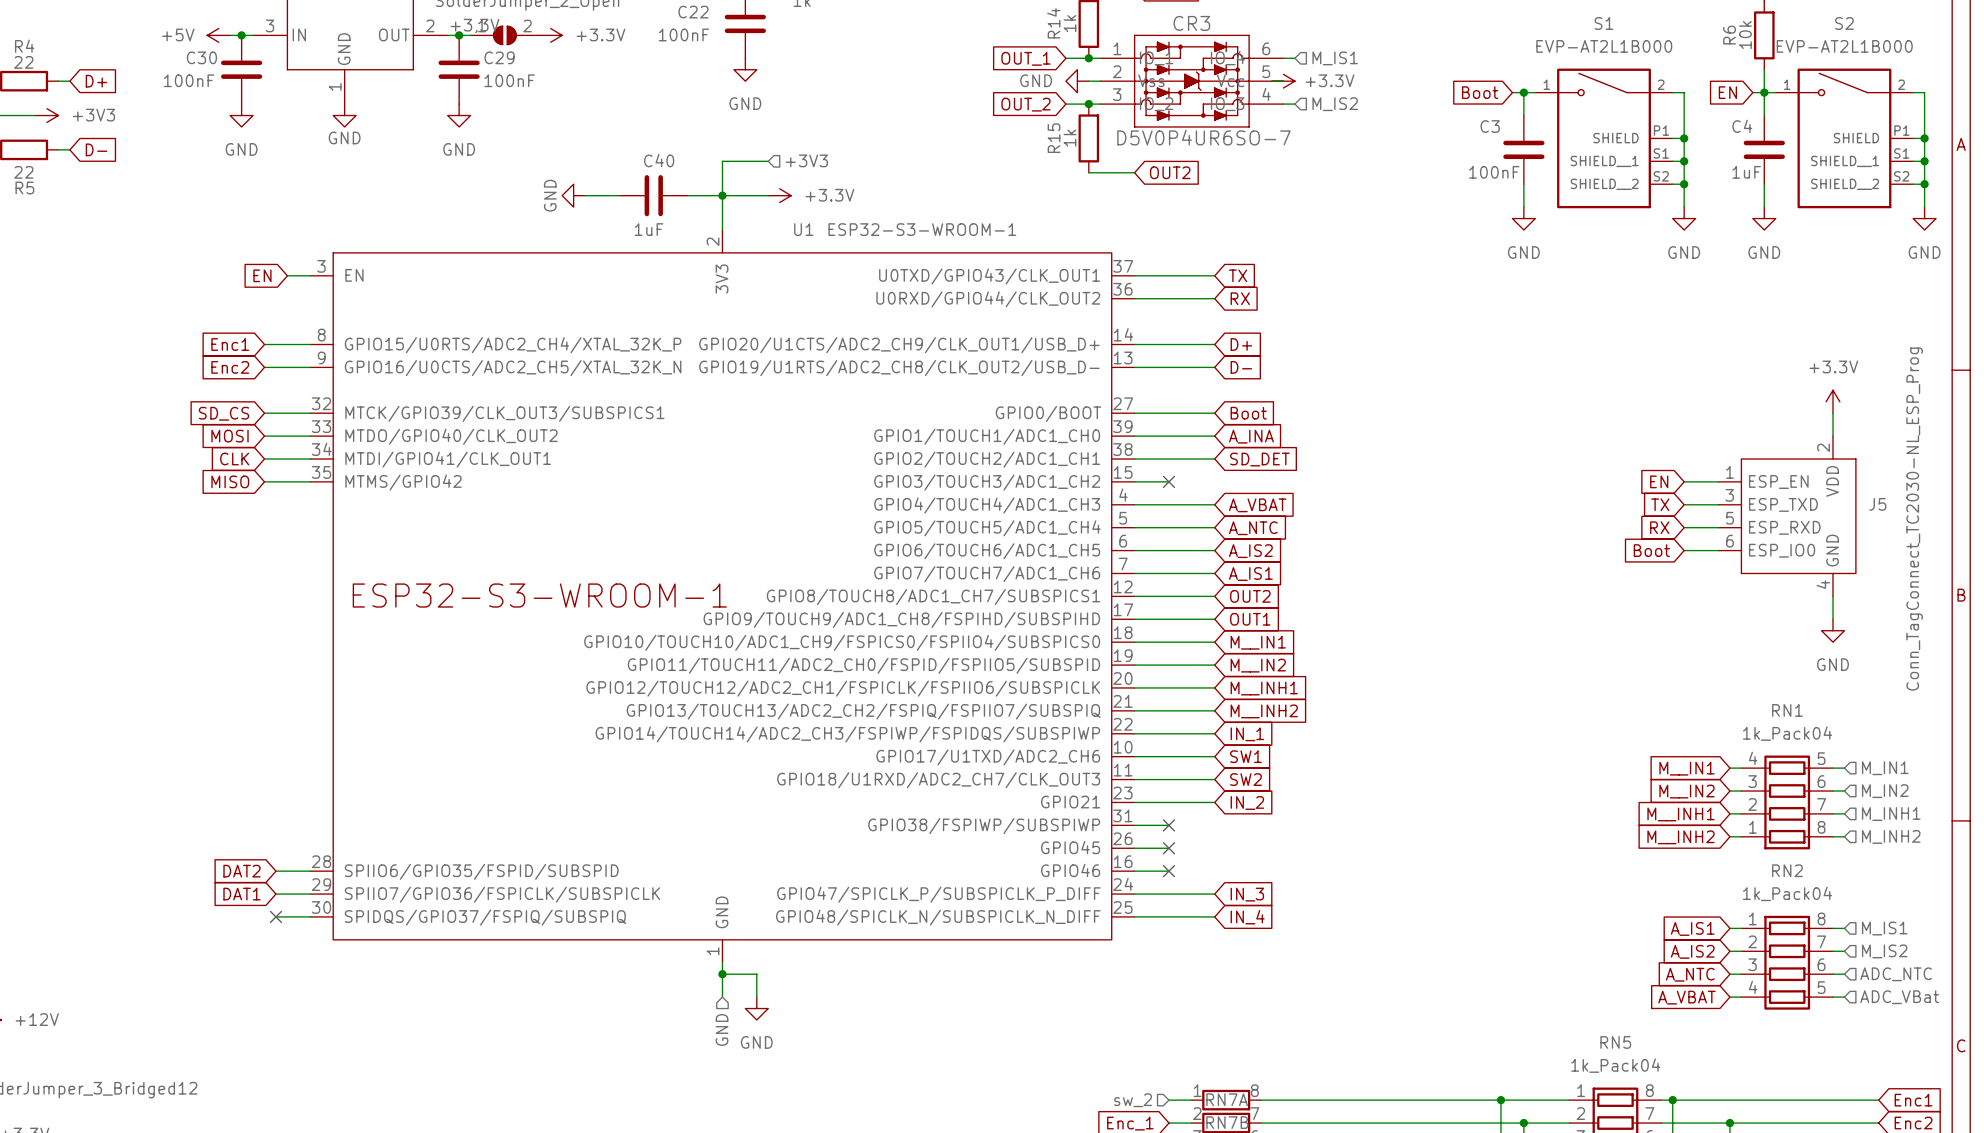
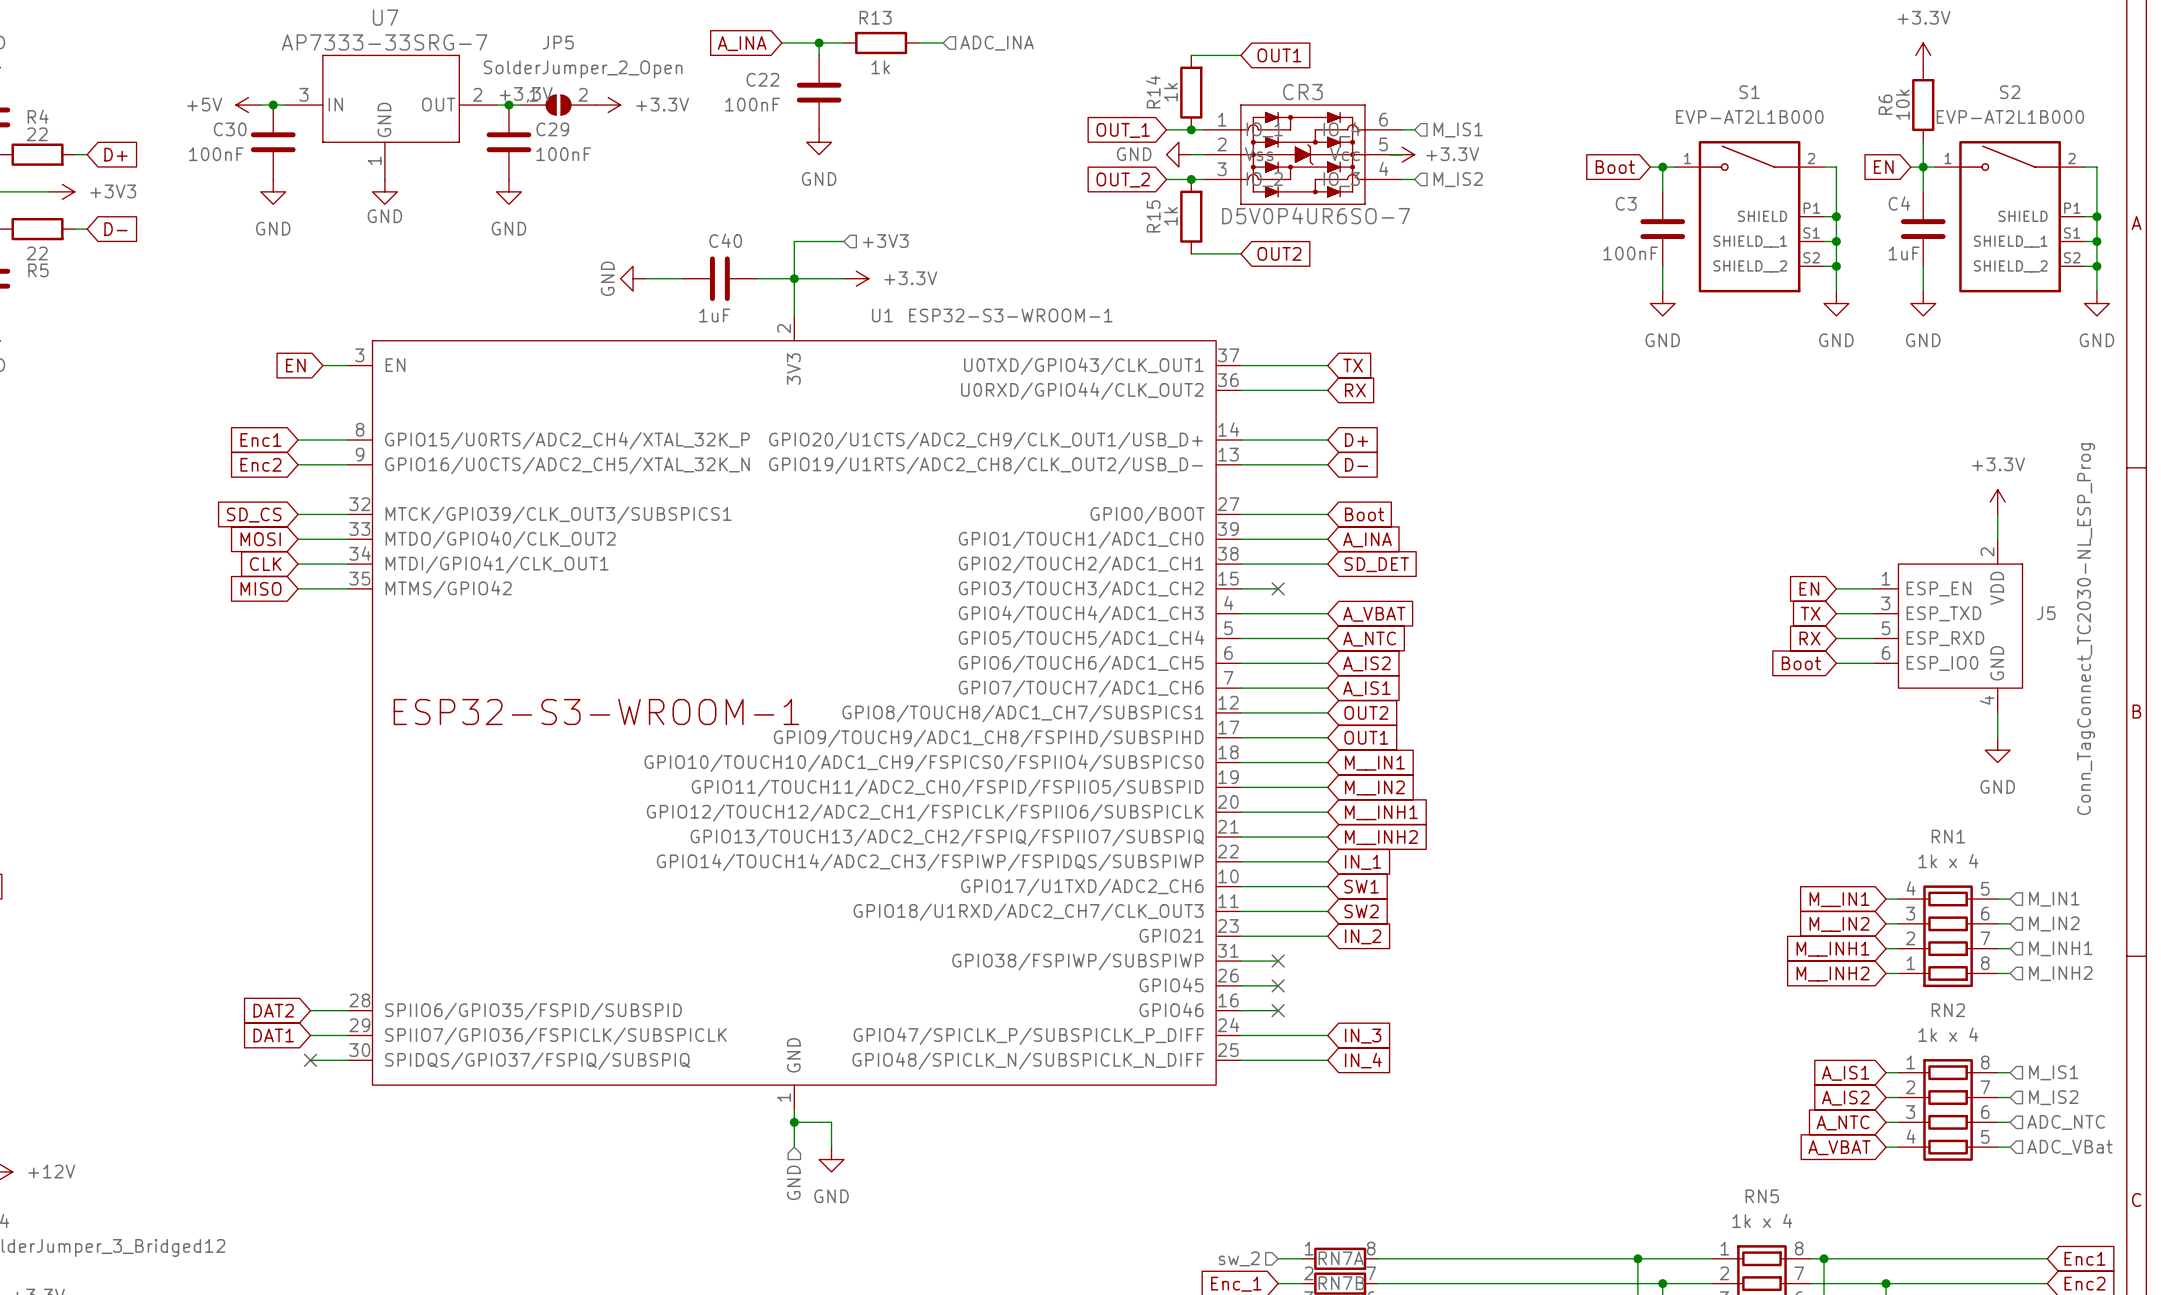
RN1 value: 1k_Pack04 (1787, 733) -> 1k x 4 (1948, 861)
RN2 value: 1k_Pack04 (1787, 893) -> 1k x 4 (1948, 1034)
RN5 value: 1k_Pack04 (1615, 1065) -> 1k x 4 (1762, 1220)

